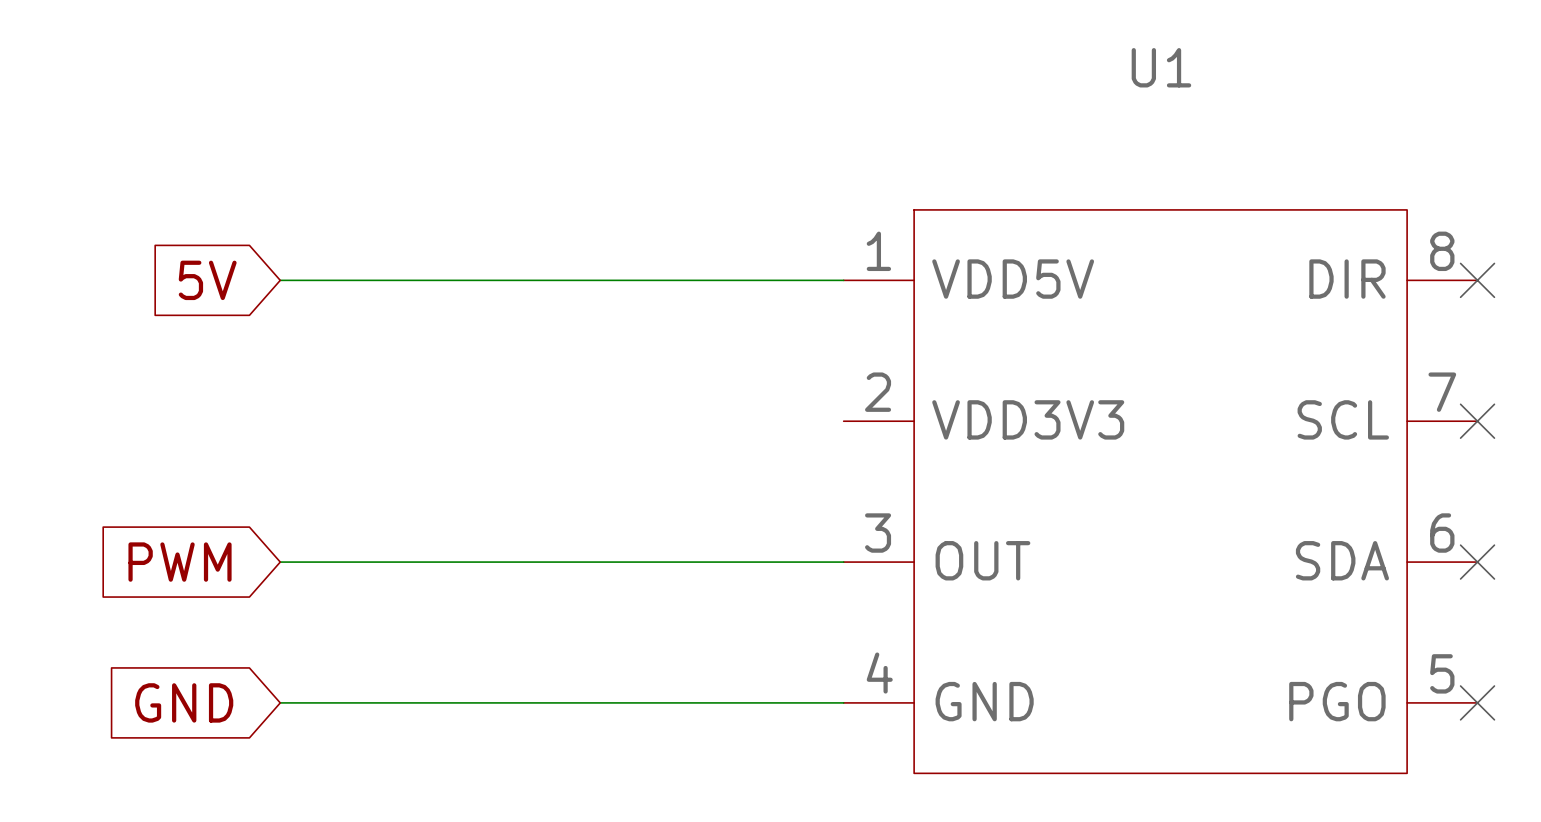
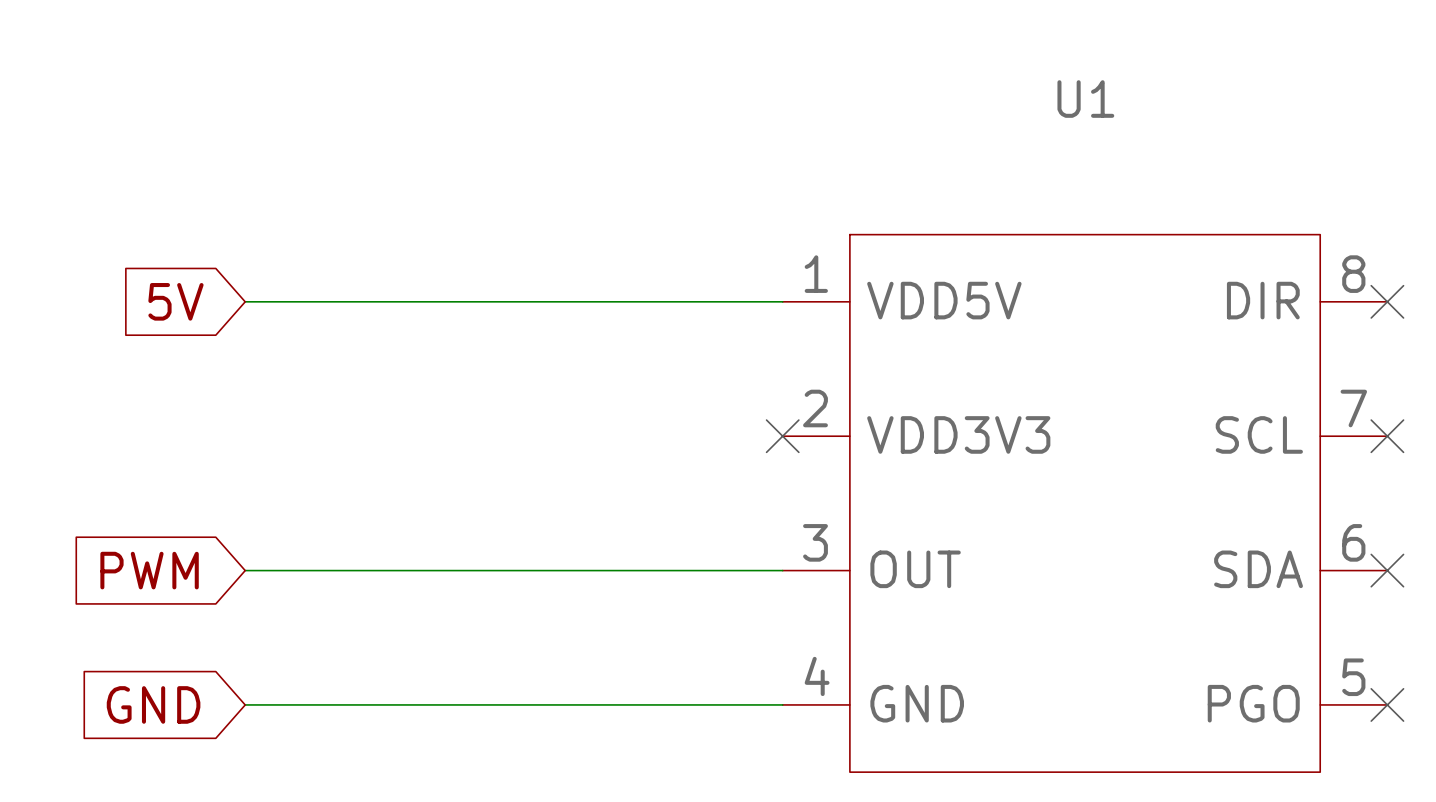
no-connect mark: none -> (782, 436)

